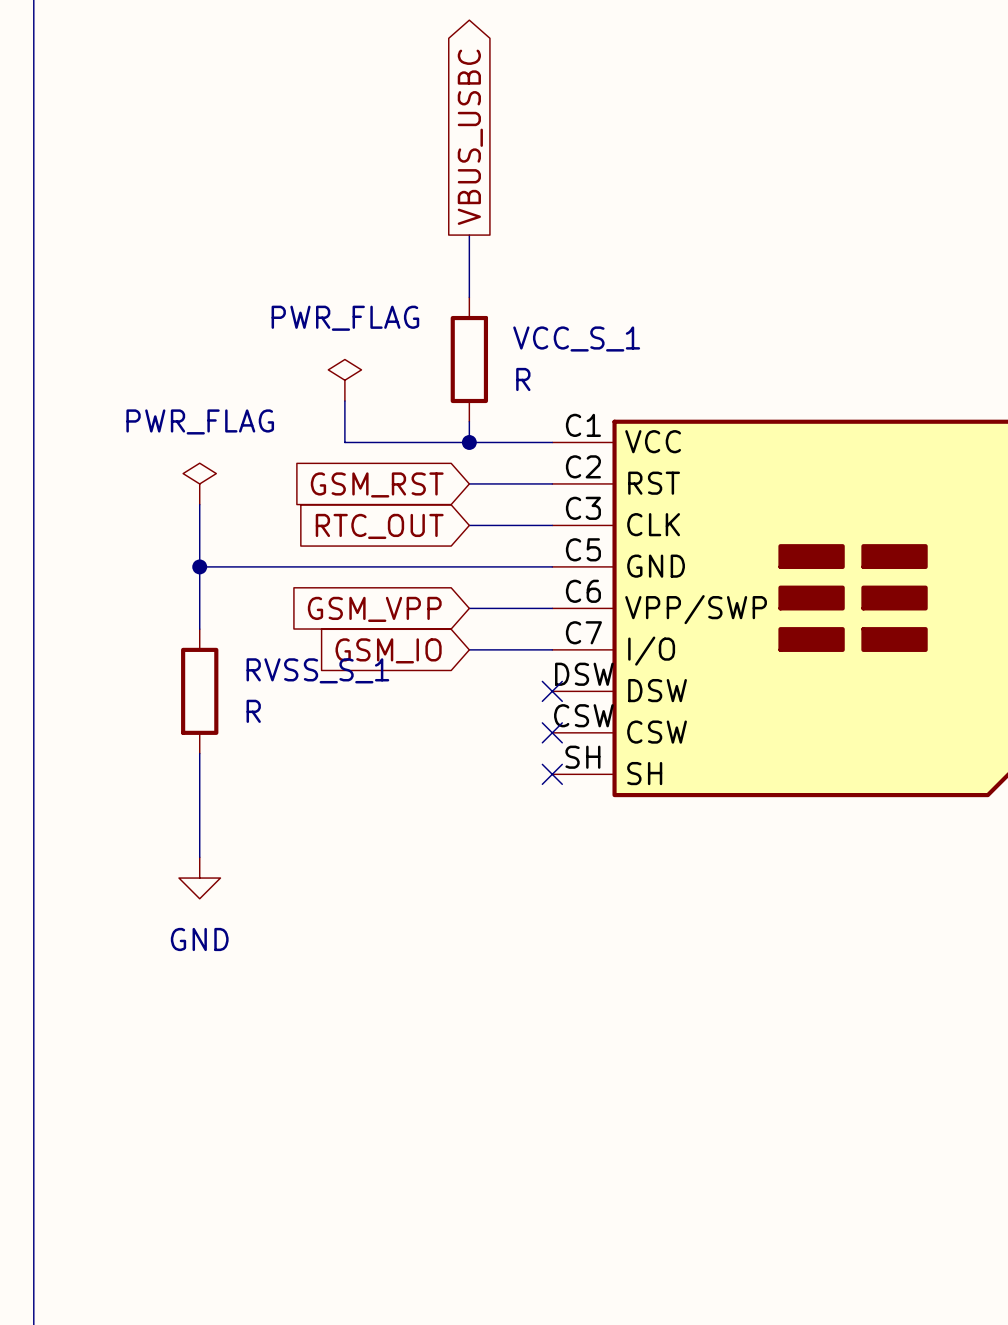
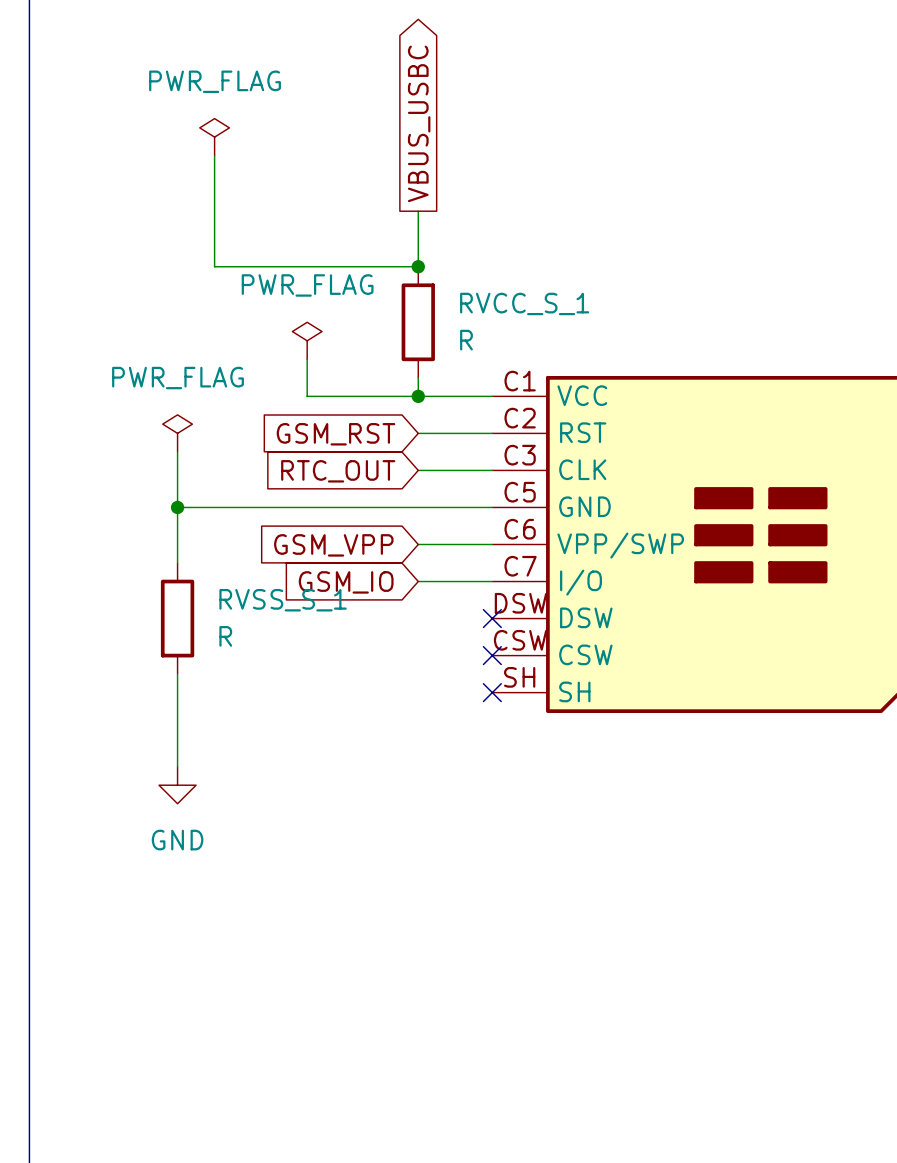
power symbol: none -> PWR_FLAG (214, 137)
wire: none -> (214, 155) (214, 266) (418, 266)
junction: none -> (418, 266)
VCC_S_1 name: VCC_S_1 (576, 338) -> RVCC_S_1 (524, 303)

